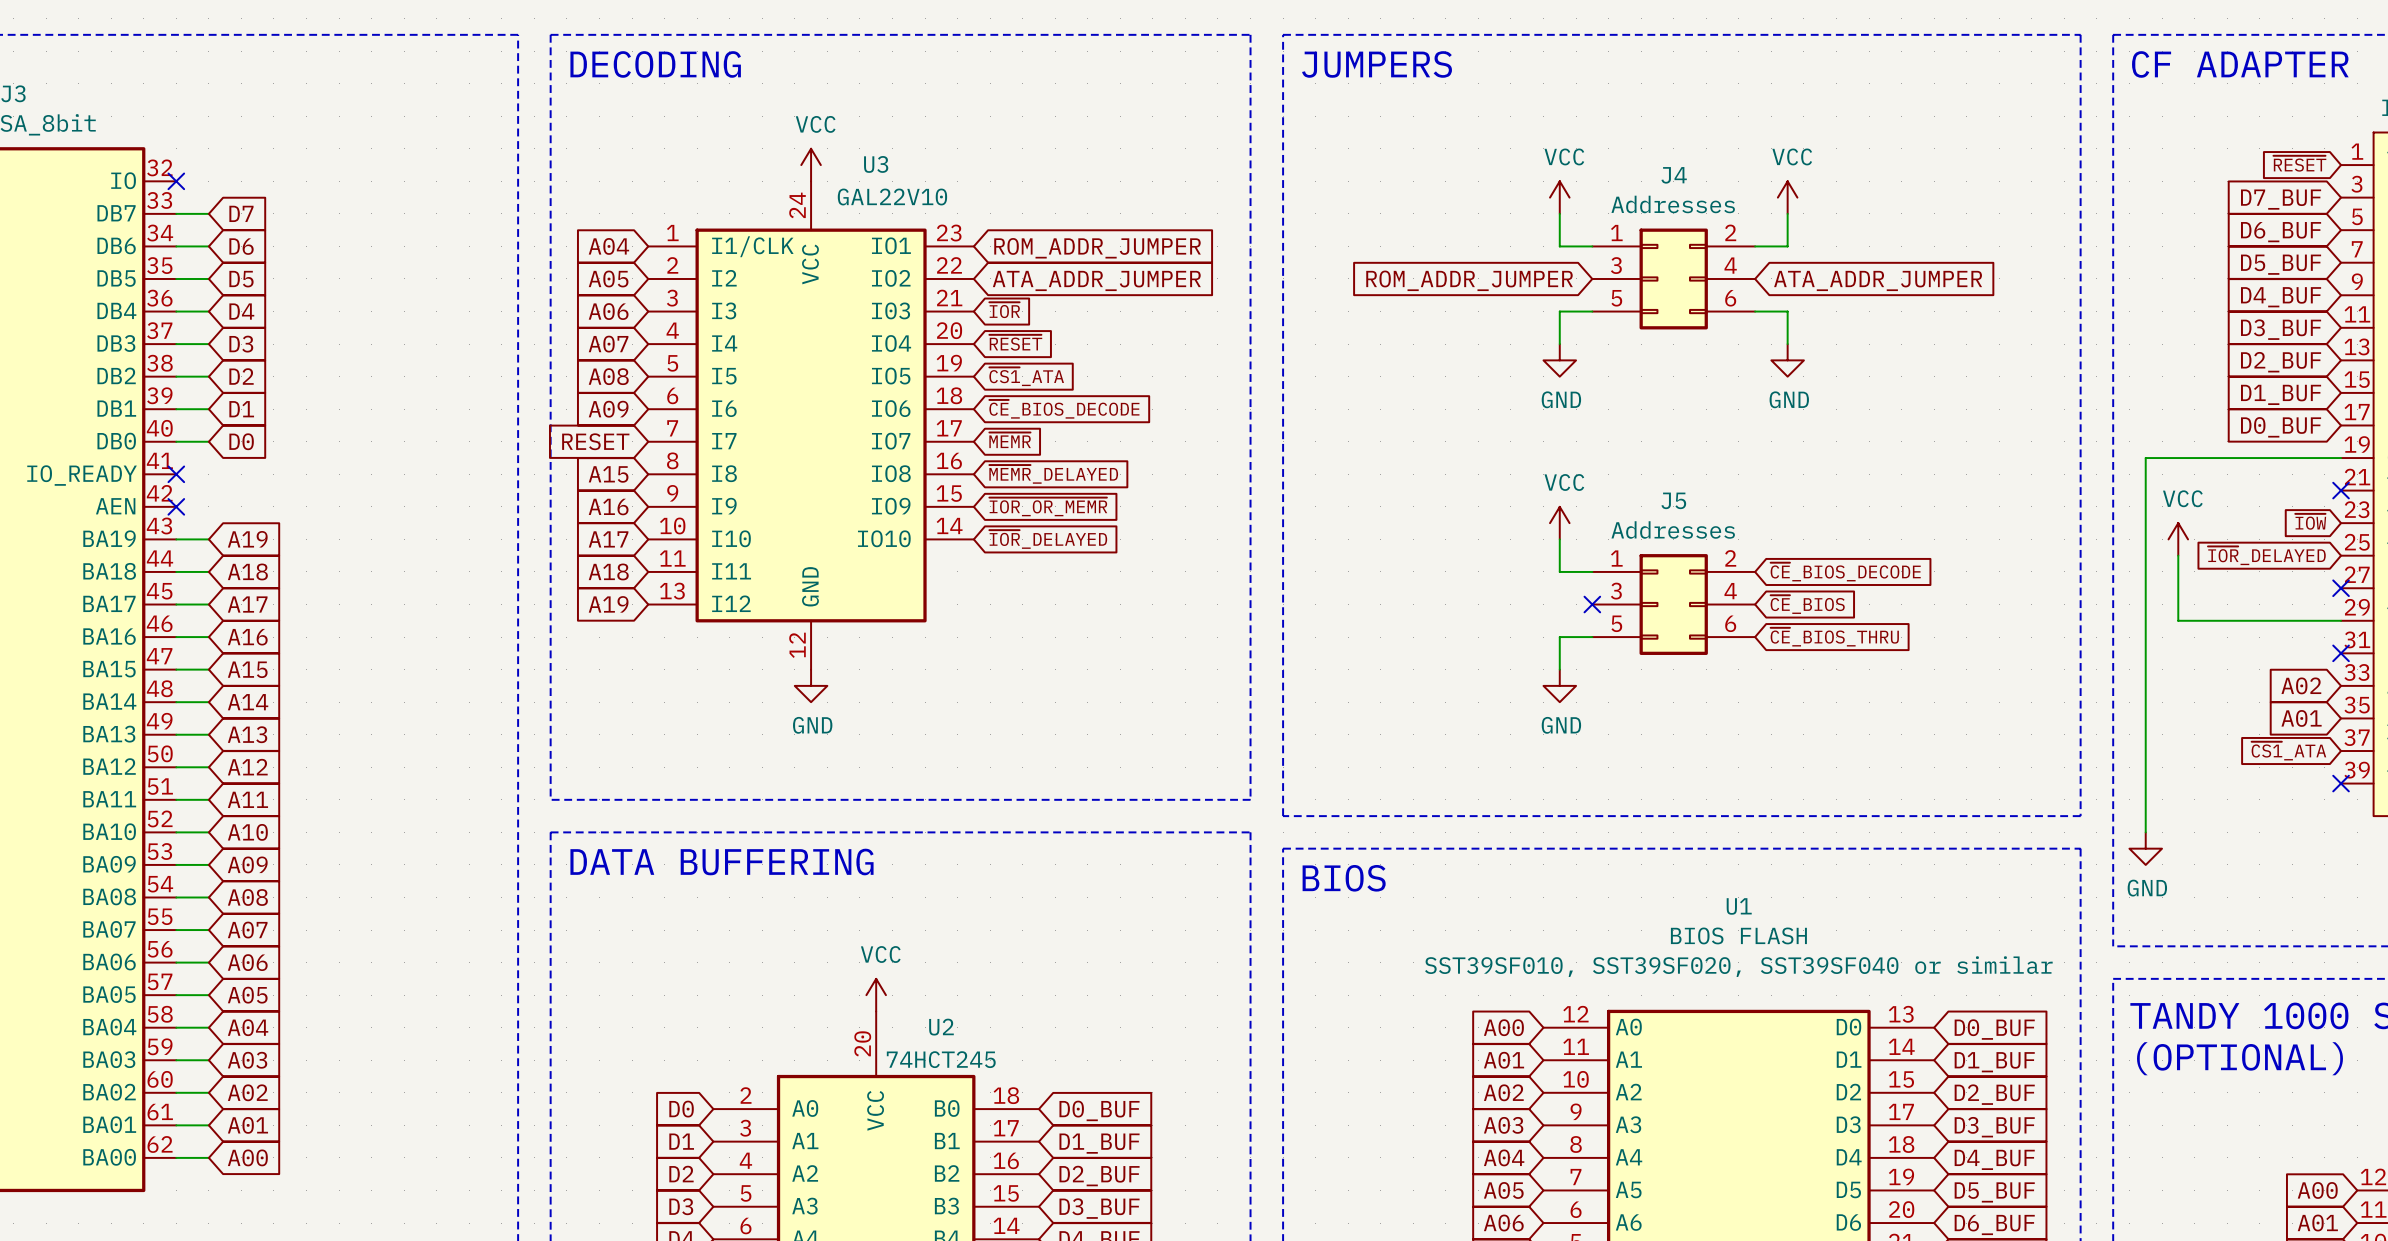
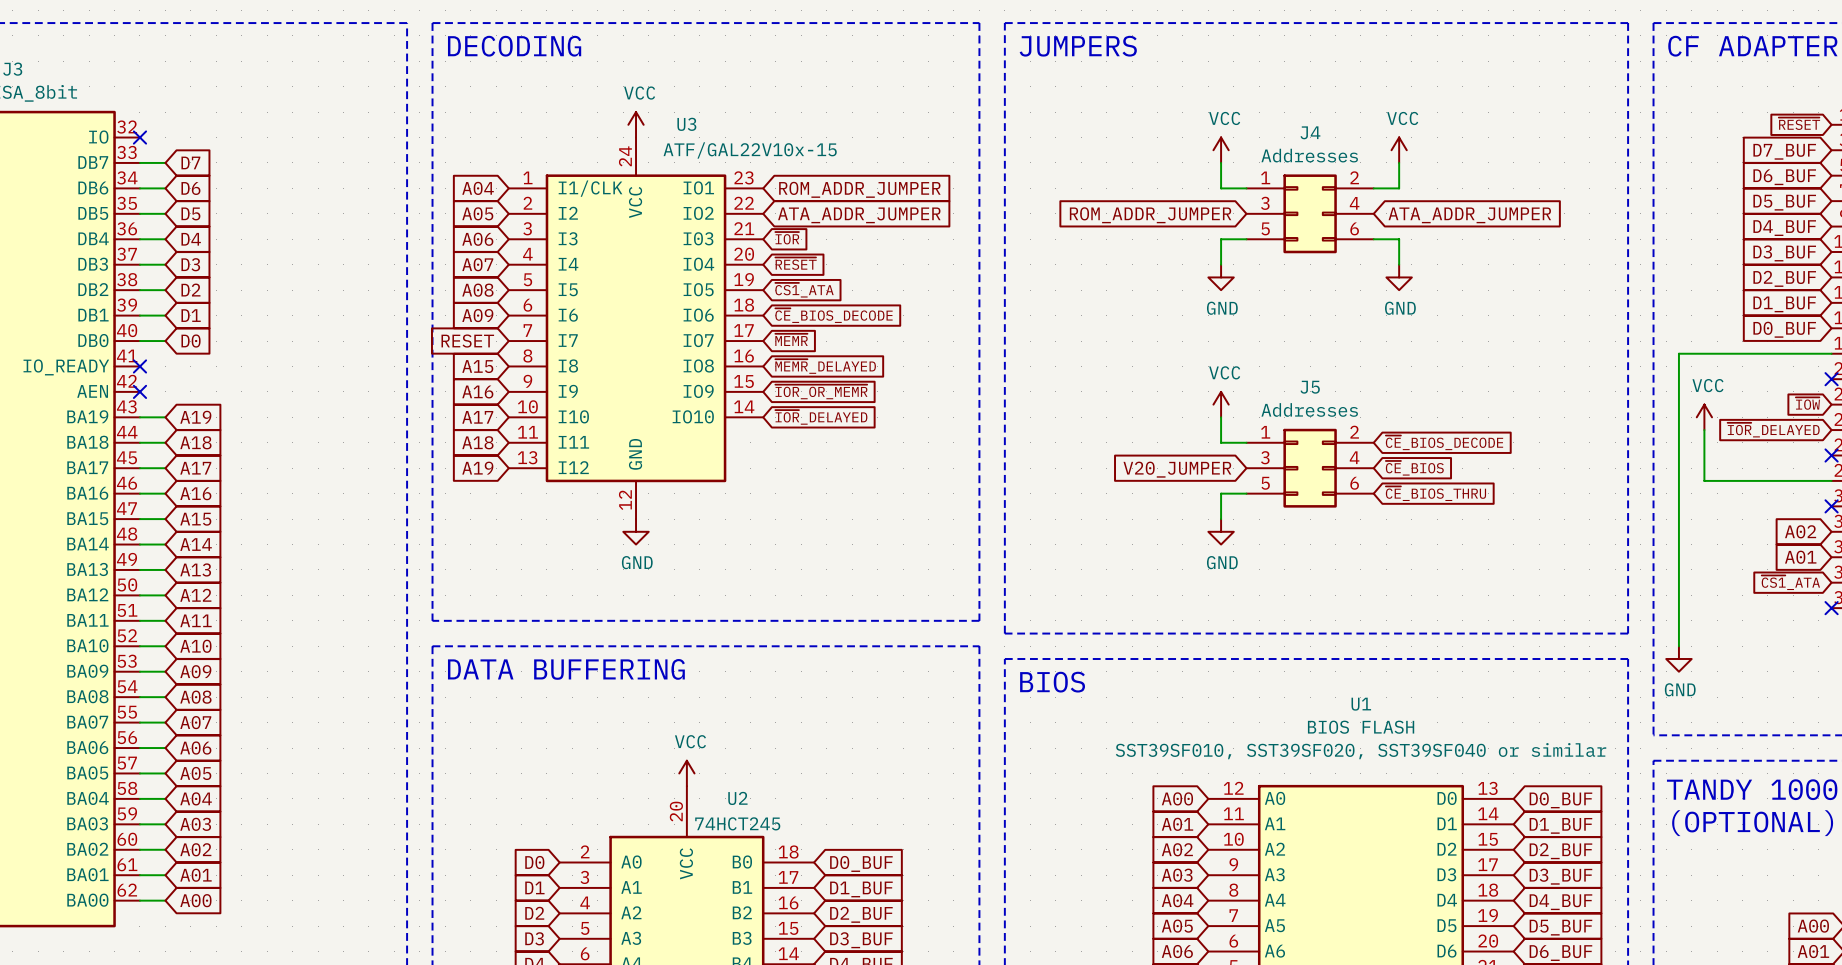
U3 value: GAL22V10 (892, 197) -> ATF/GAL22V10x-15 (750, 150)
no-connect mark: (1592, 604) -> none
global label: none -> V20_JUMPER (1177, 469)

